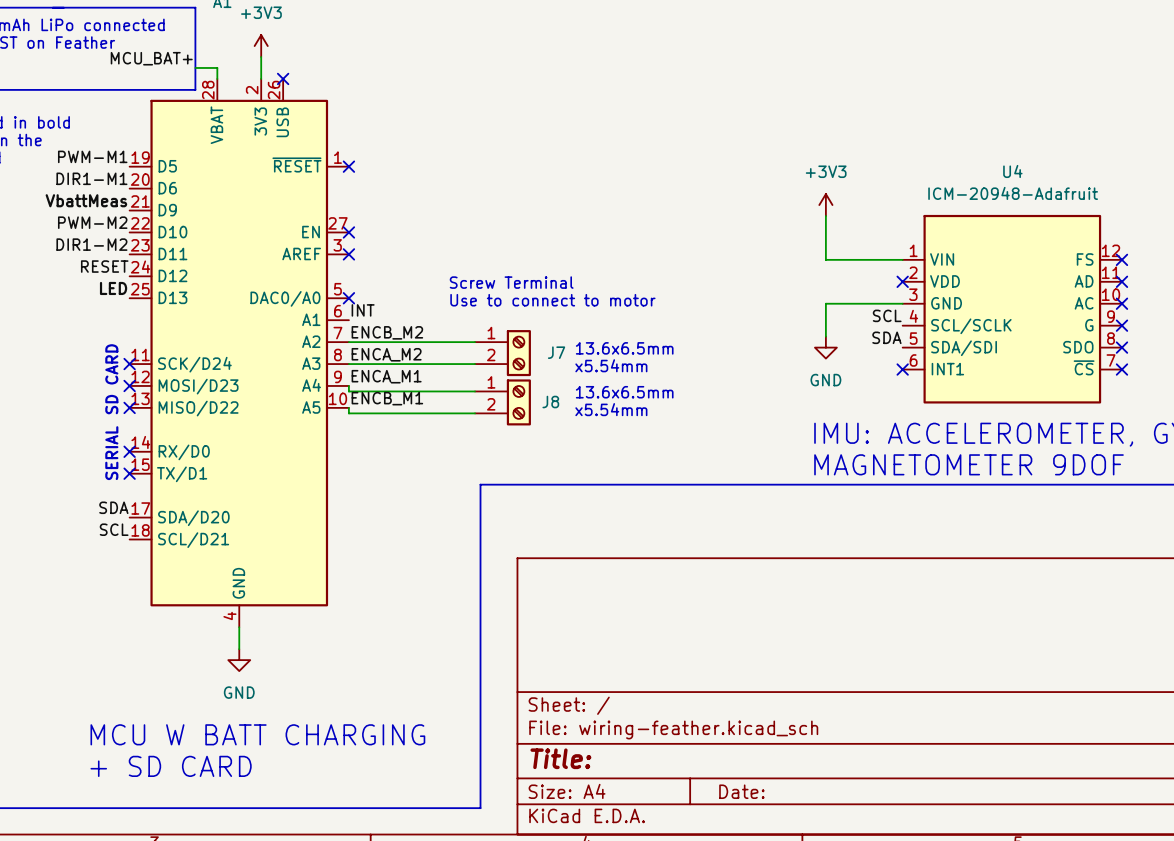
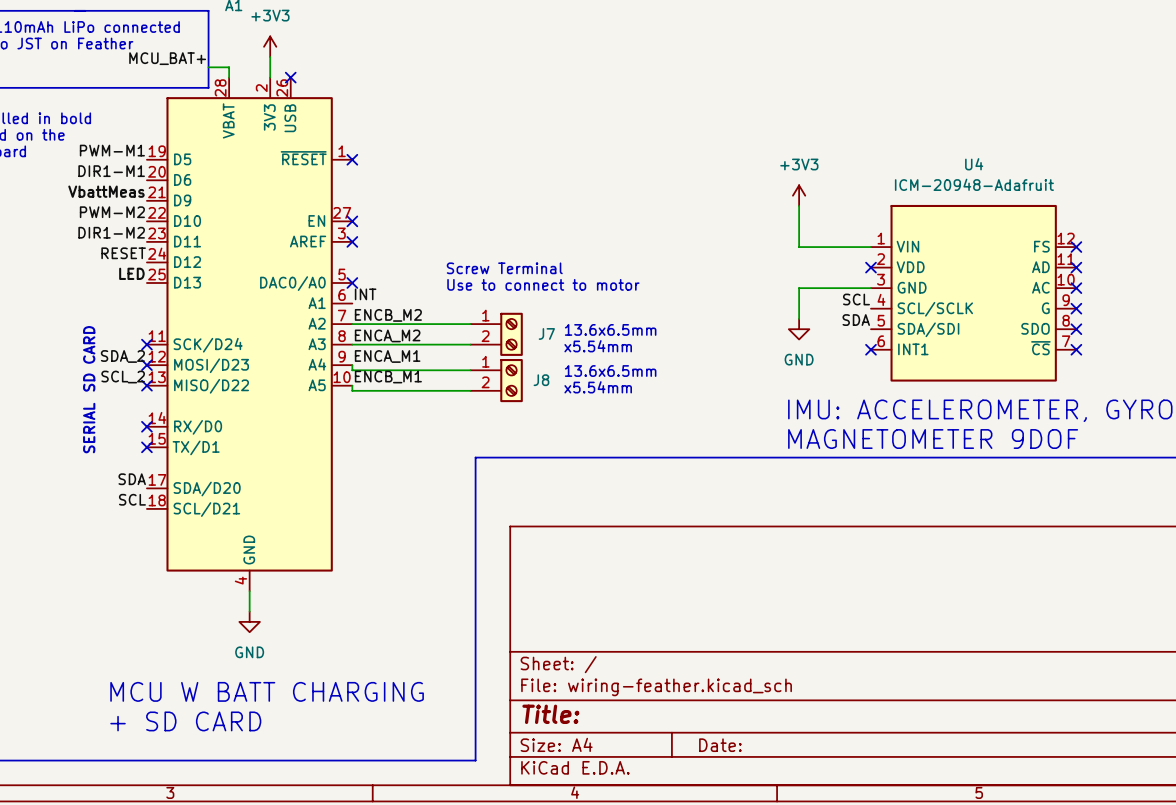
label: none -> SDA_2 (122, 356)
text position: SD CARD (111, 379) -> SD CARD (89, 358)
label: none -> SCL_2 (123, 377)
text position: SERIAL (111, 453) -> SERIAL (89, 428)

